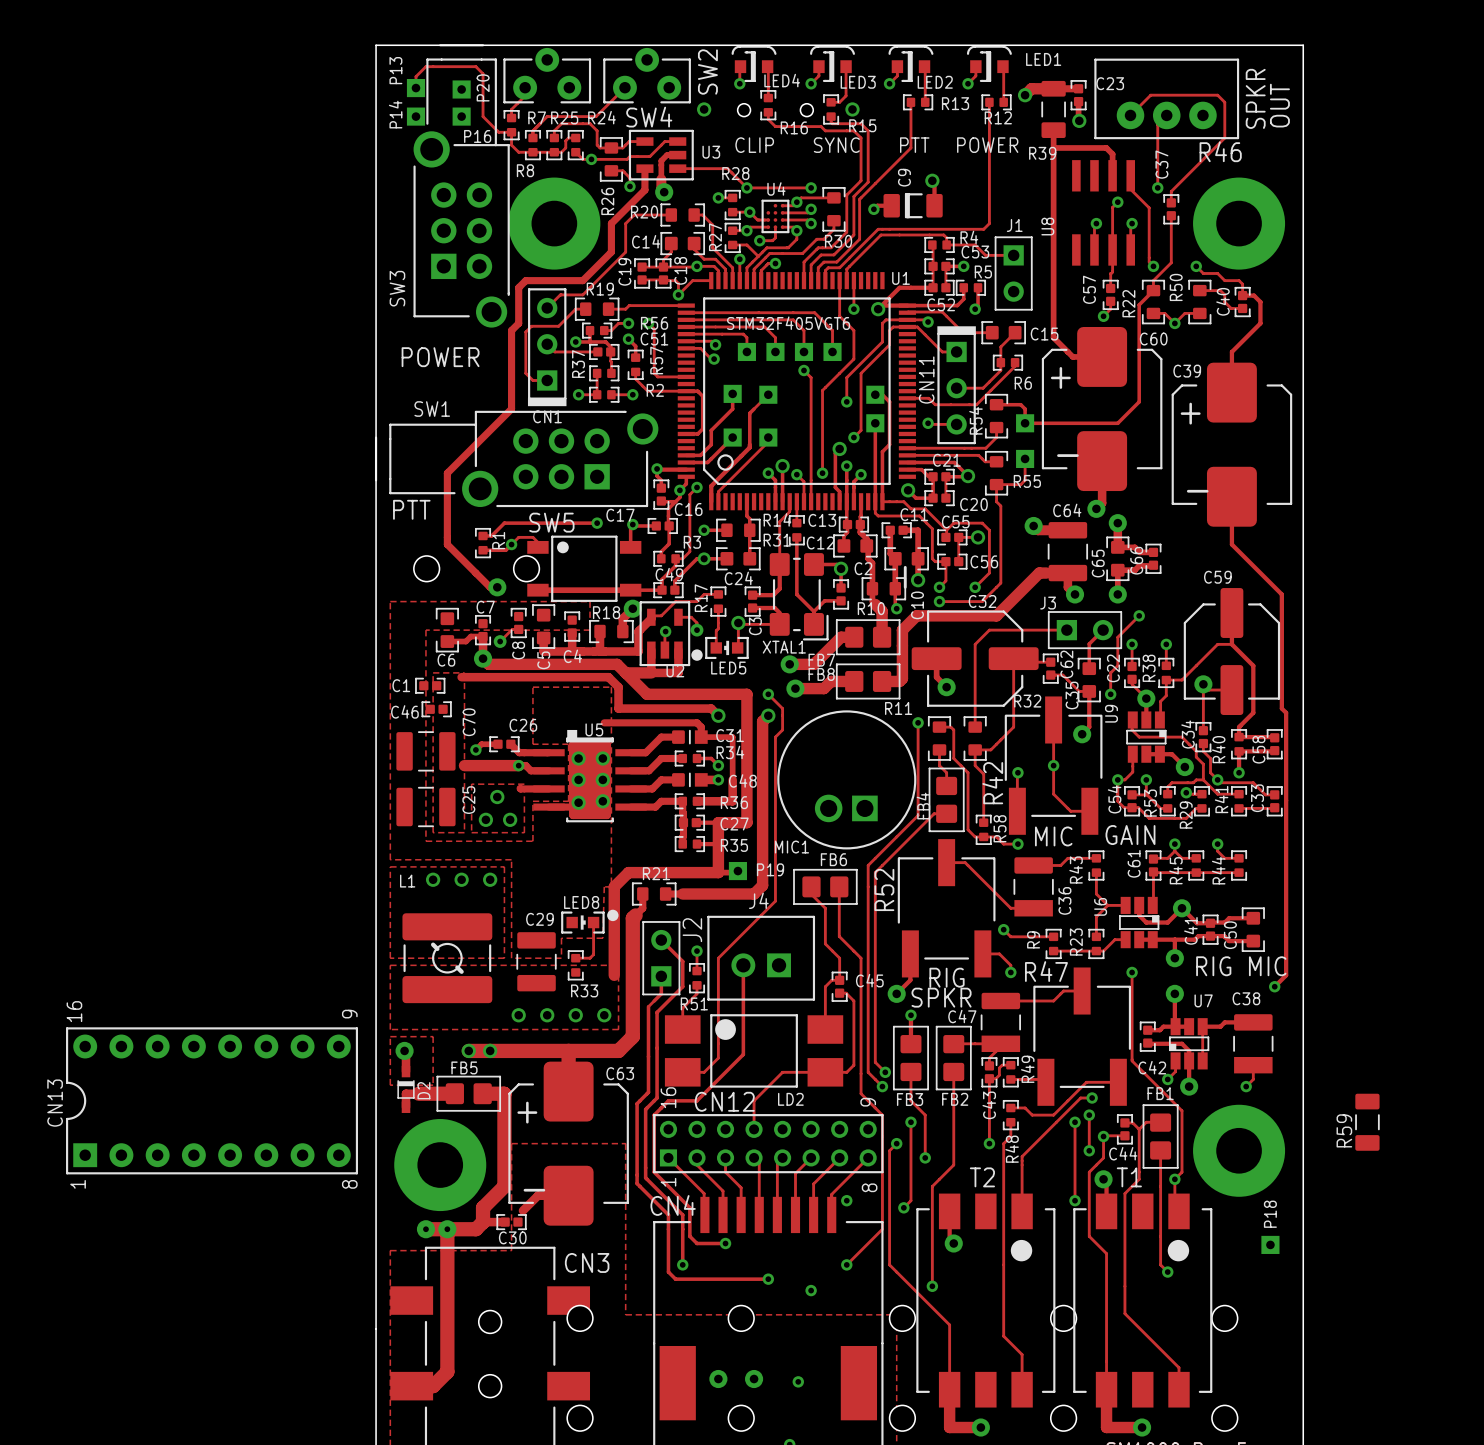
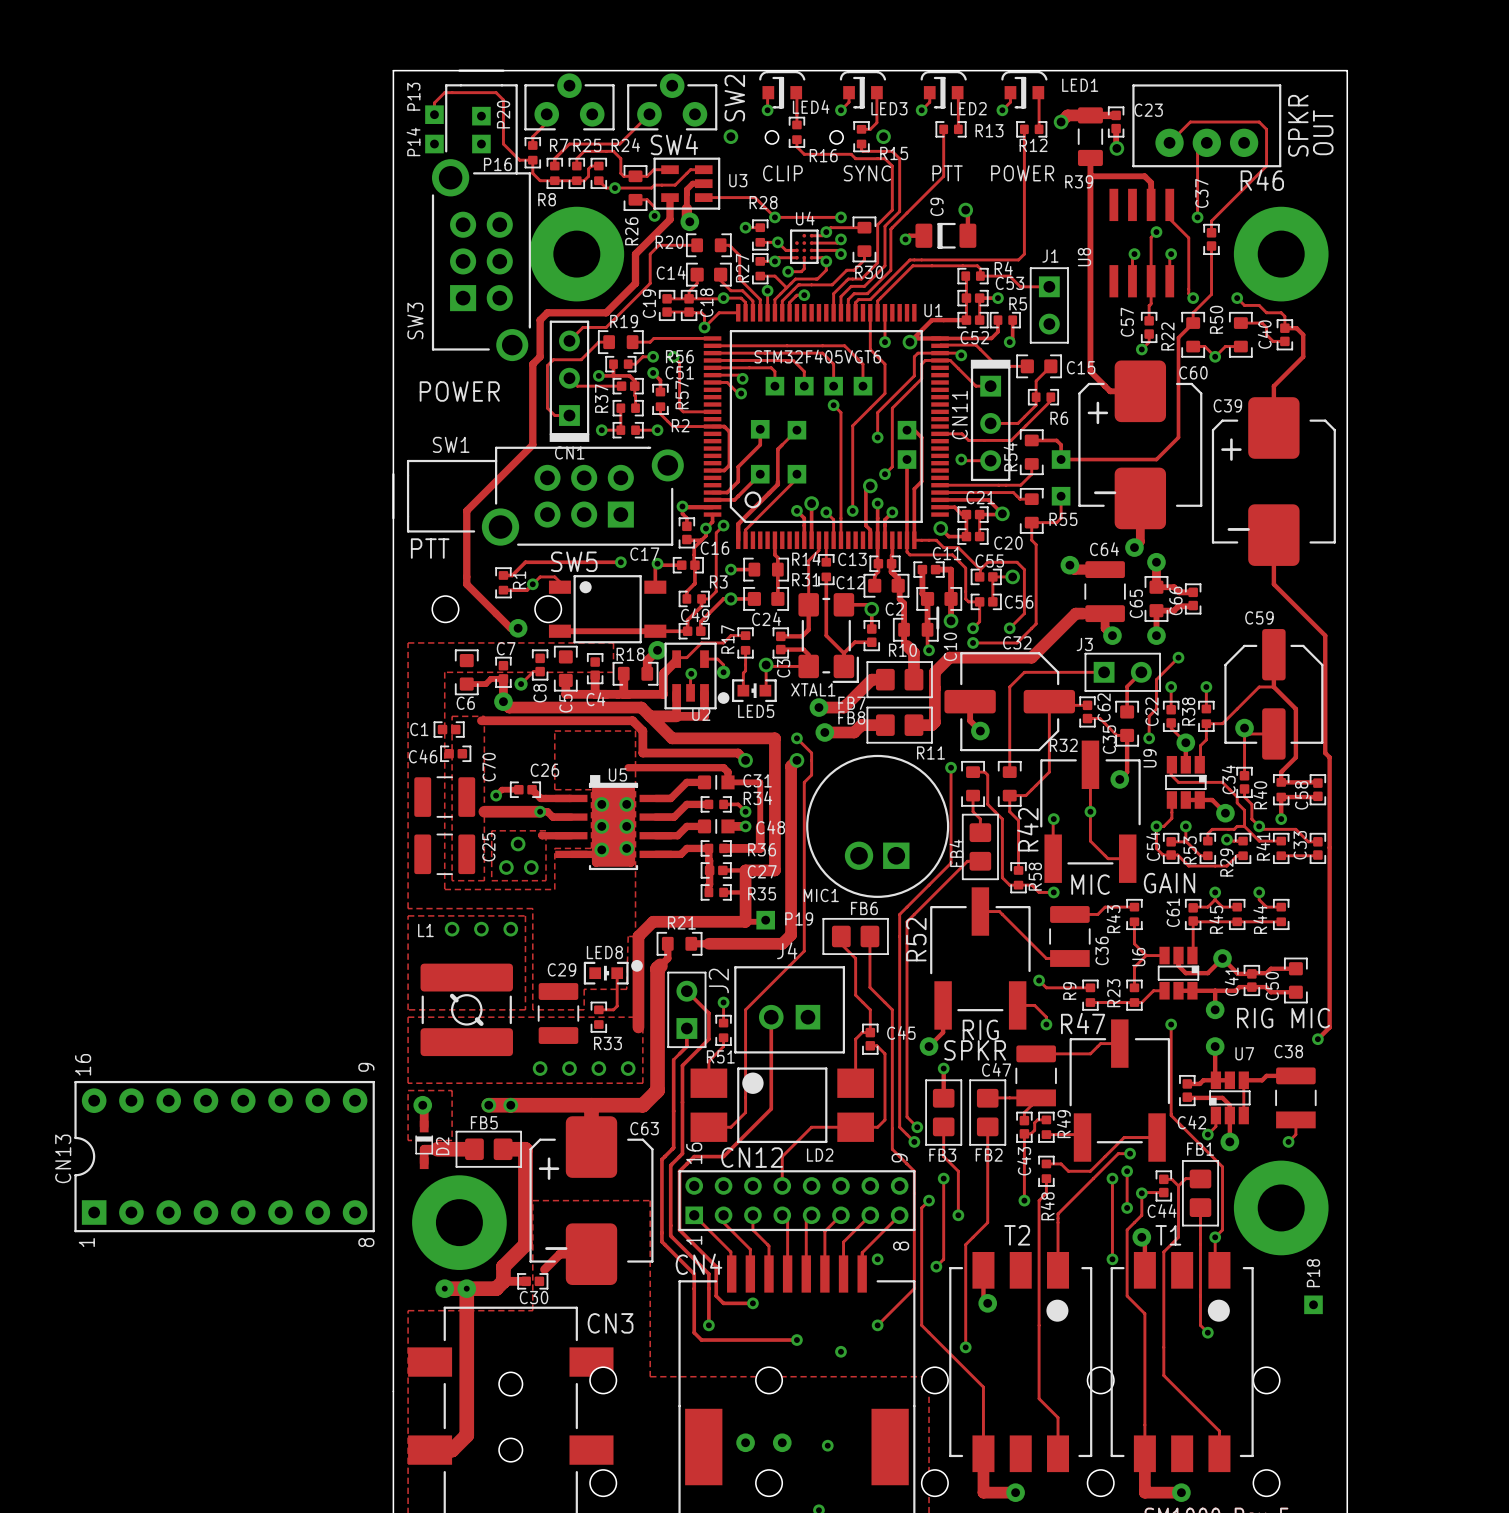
R59: (1367, 1122) -> none

